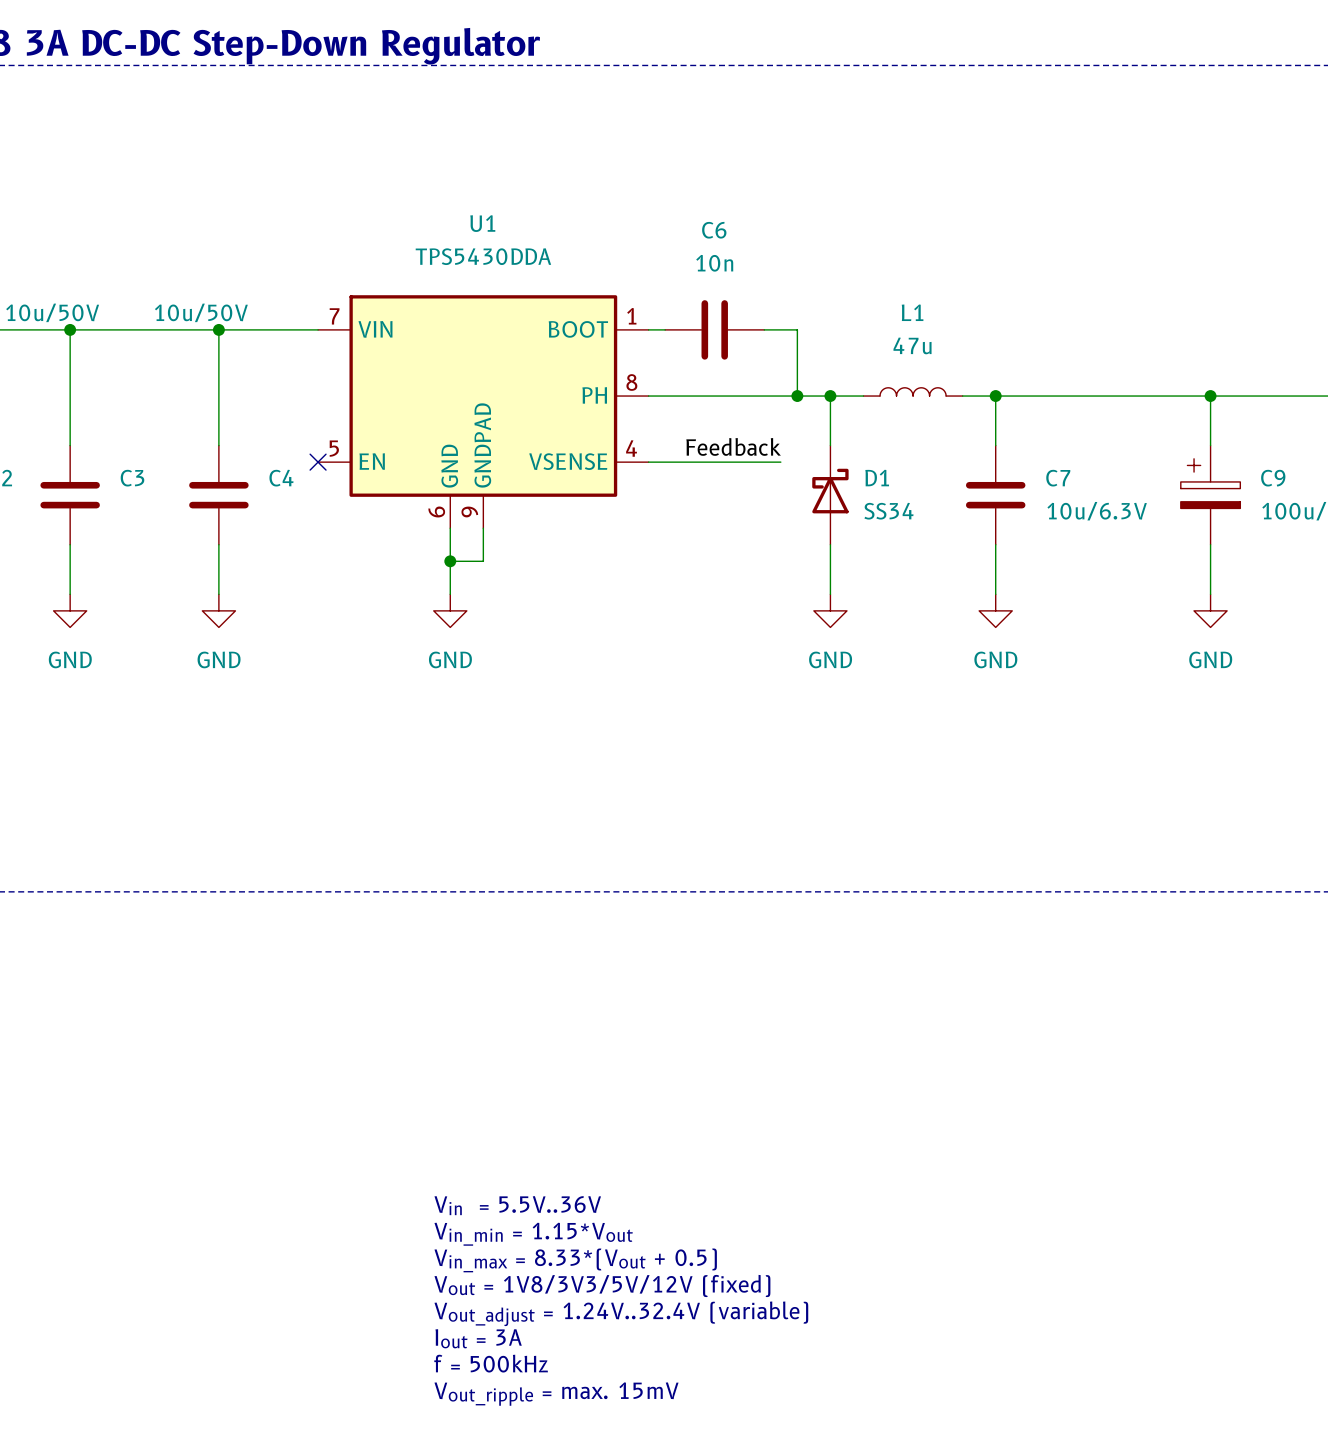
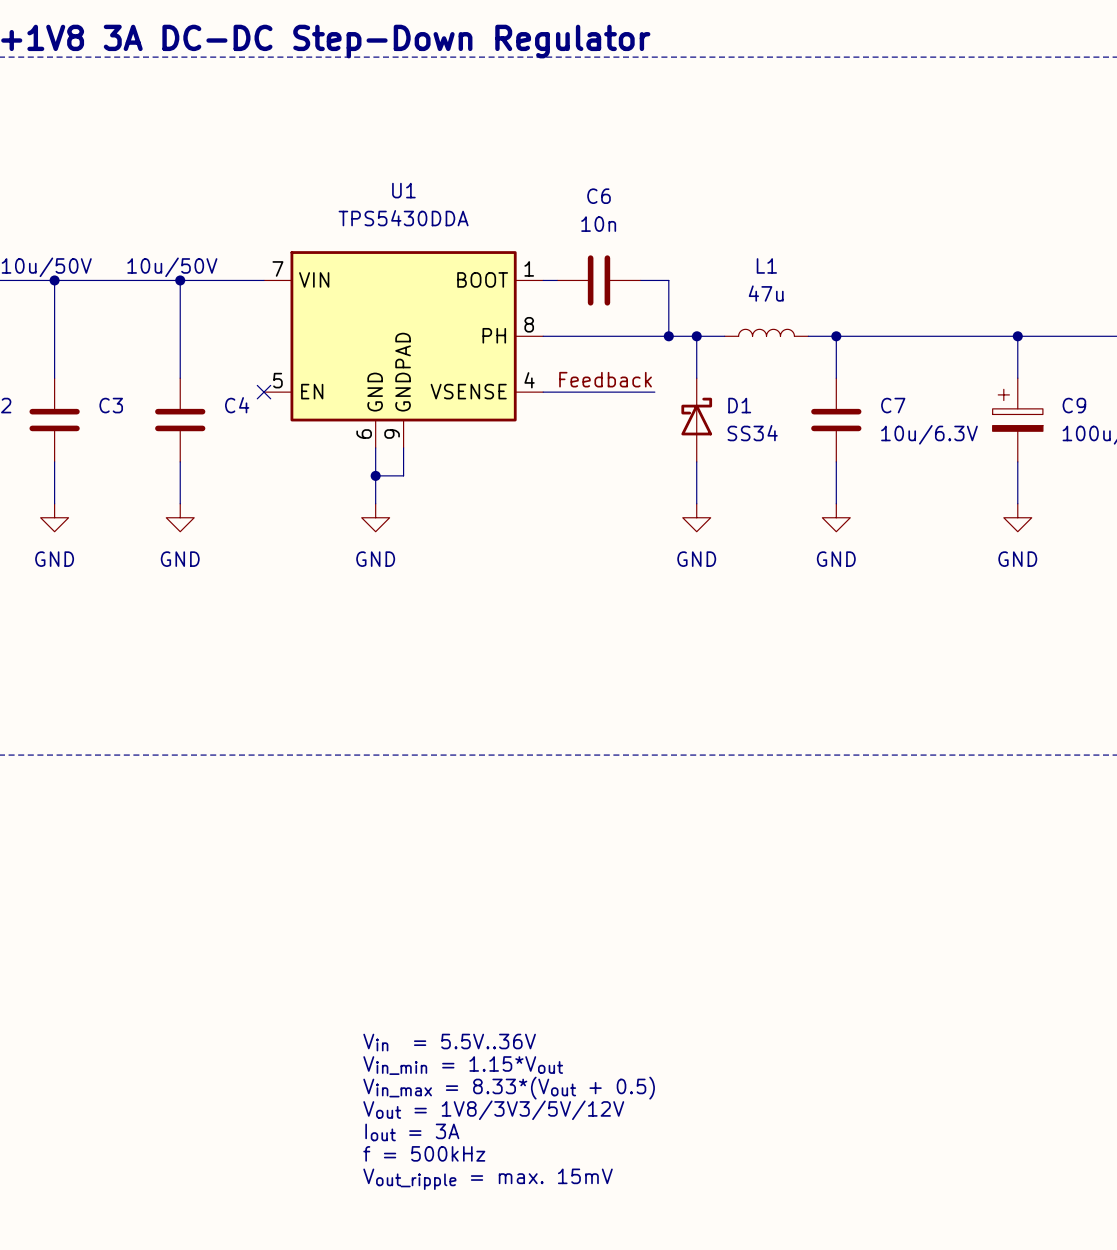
text: Vin = 5.5V..36V (517, 1205) -> none
text: Vin_min = 1.15*Vout (533, 1234) -> Vin = 5.5V..36V (449, 1042)
text: Vin_max = 8.33*(Vout + 0.5) (575, 1260) -> Vin_min = 1.15*Vout (463, 1065)
text: Vout = 1V8/3V3/5V/12V (fixed) (602, 1285) -> Vin_max = 8.33*(Vout + 0.5) (509, 1088)
text: Vout_adjust = 1.24V..32.4V (variable) (621, 1313) -> Vout = 1V8/3V3/5V/12V (493, 1110)

